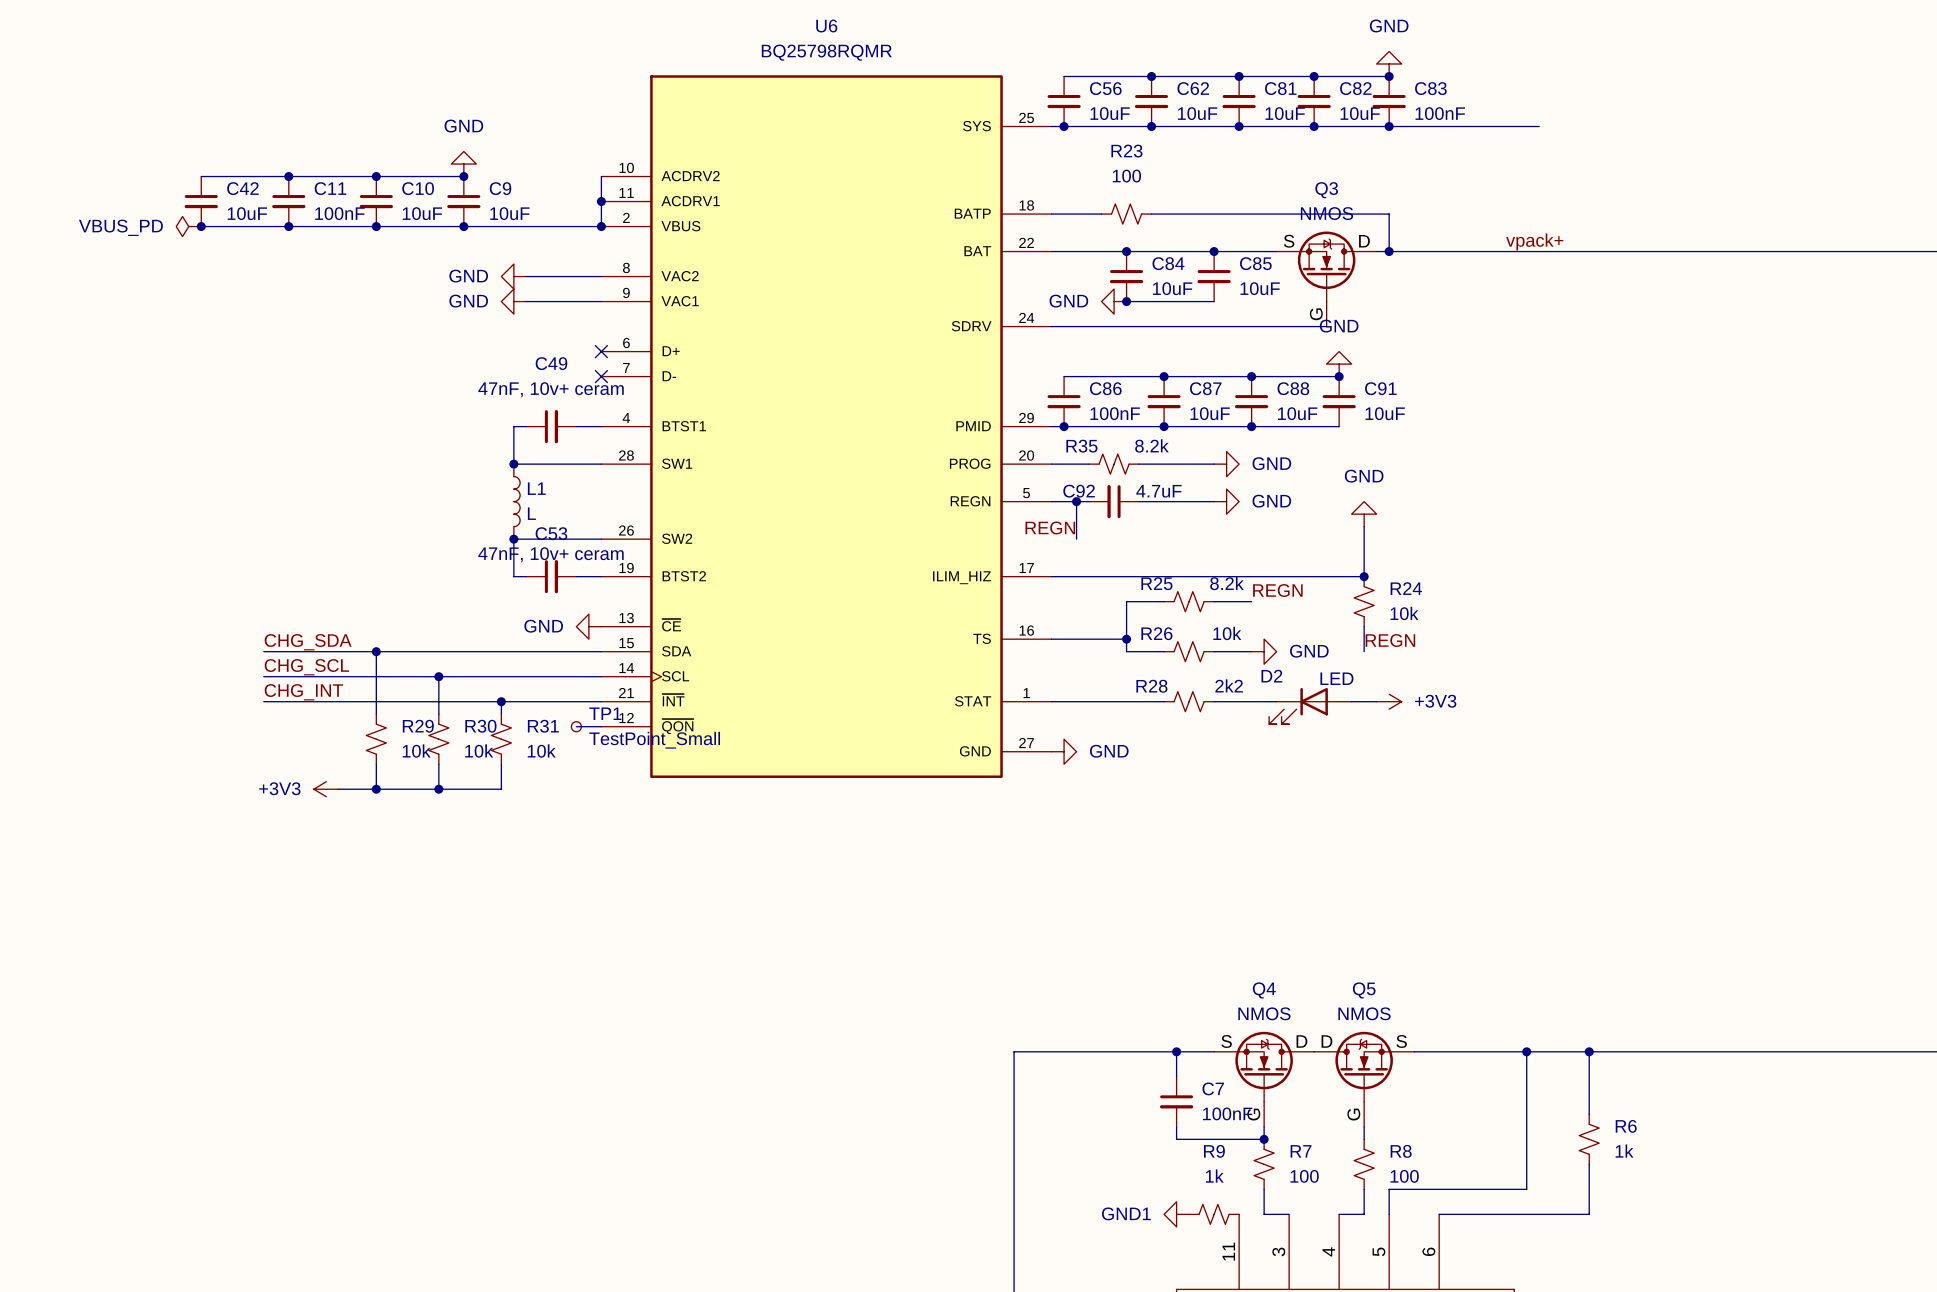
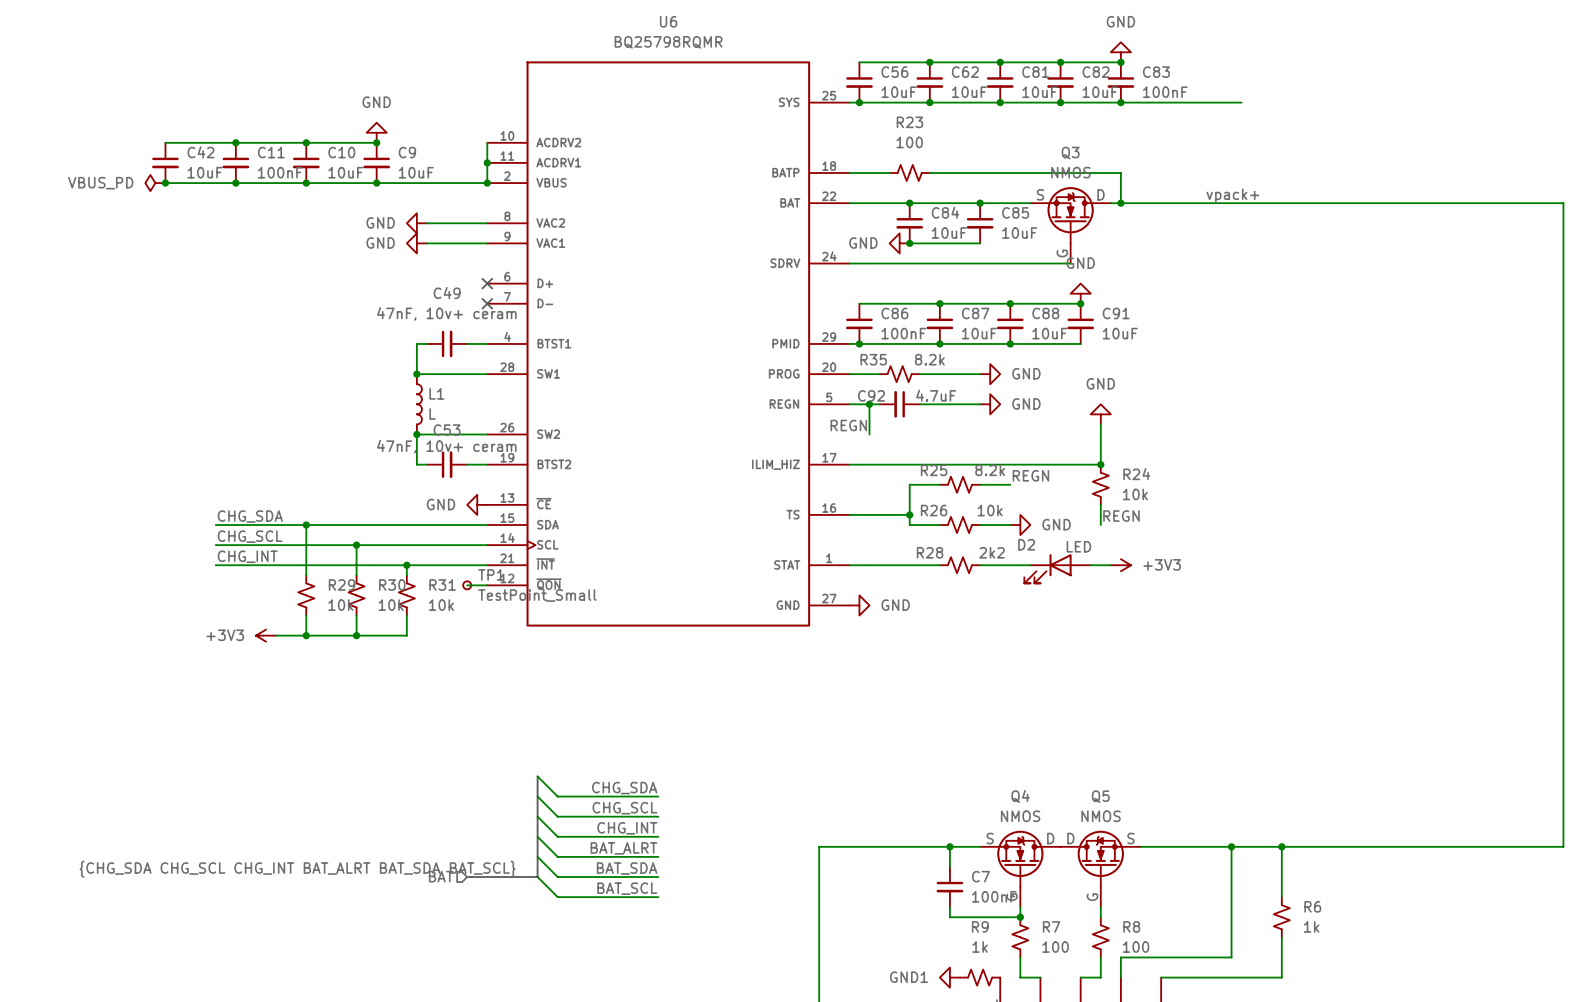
wire: none -> (537, 776) (557, 796) (658, 796)
bus: none -> (537, 776) (537, 877) (467, 877)
label: none -> CHG_SDA (624, 788)
wire: none -> (537, 796) (557, 816) (658, 816)
label: none -> CHG_SCL (624, 808)
wire: none -> (537, 816) (557, 836) (658, 836)
label: none -> CHG_INT (627, 828)
wire: none -> (537, 836) (557, 856) (658, 856)
label: none -> BAT_ALRT (623, 848)
wire: none -> (537, 856) (557, 877) (658, 877)
label: none -> {CHG_SDA CHG_SCL CHG_INT BAT_ALRT BAT_SDA BAT_SCL} (297, 869)
label: none -> BAT_SDA (627, 868)
hierarchical label: none -> BAT (441, 876)
wire: none -> (537, 877) (557, 897) (658, 897)
label: none -> BAT_SCL (627, 888)

